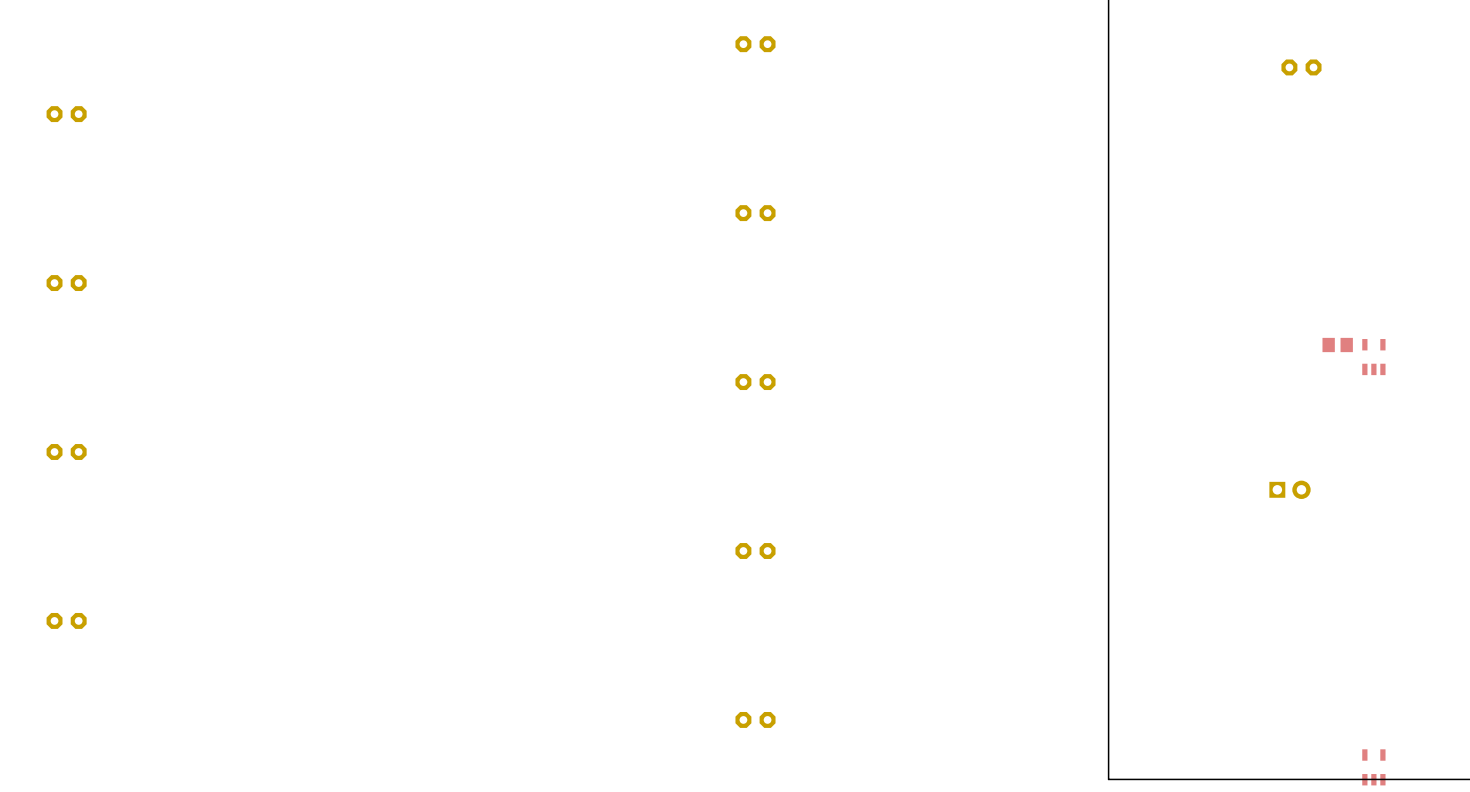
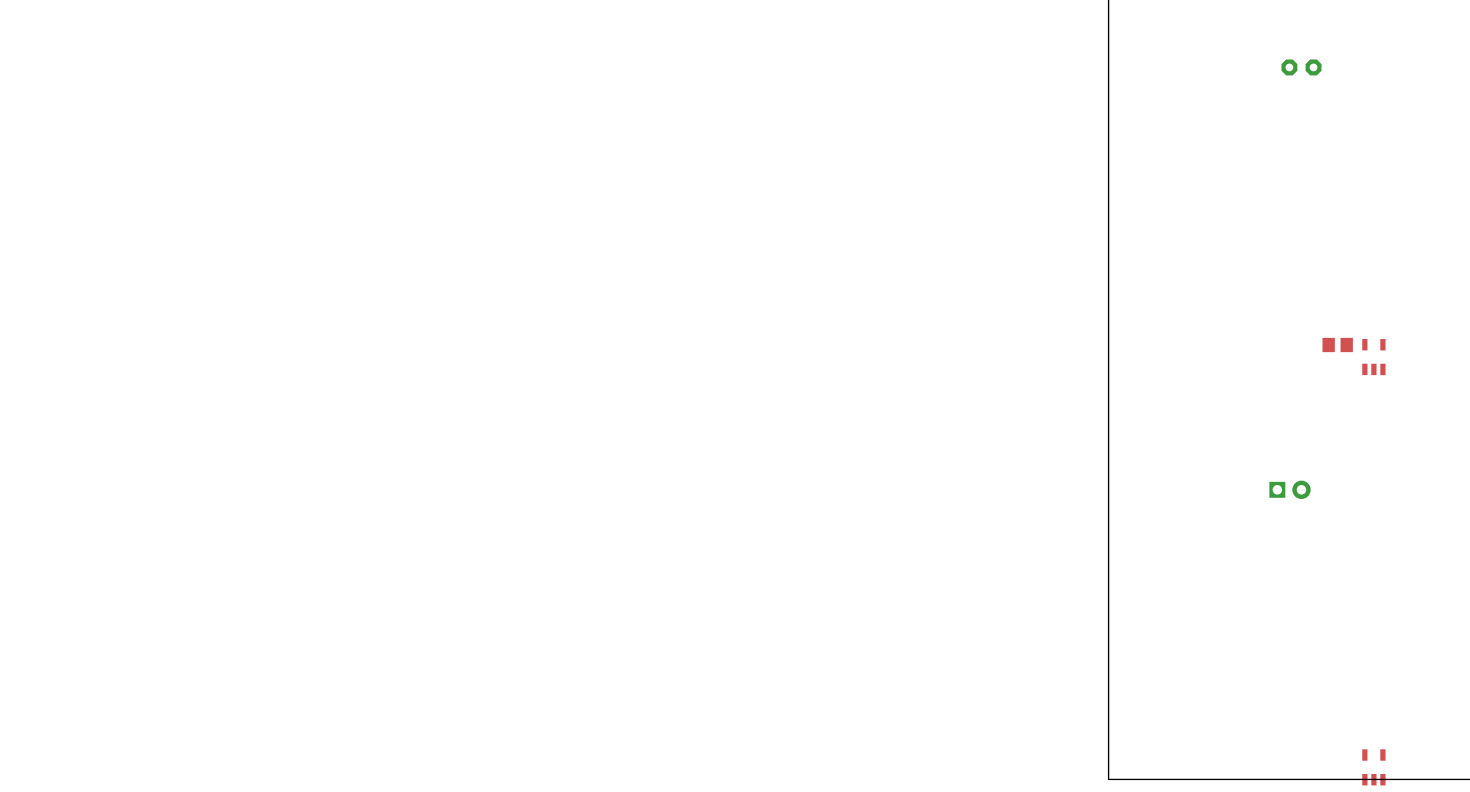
part: (755, 44) -> none
part: (66, 114) -> none
part: (755, 213) -> none
part: (66, 283) -> none
part: (755, 382) -> none
part: (66, 451) -> none
part: (755, 551) -> none
part: (66, 620) -> none
part: (755, 719) -> none

